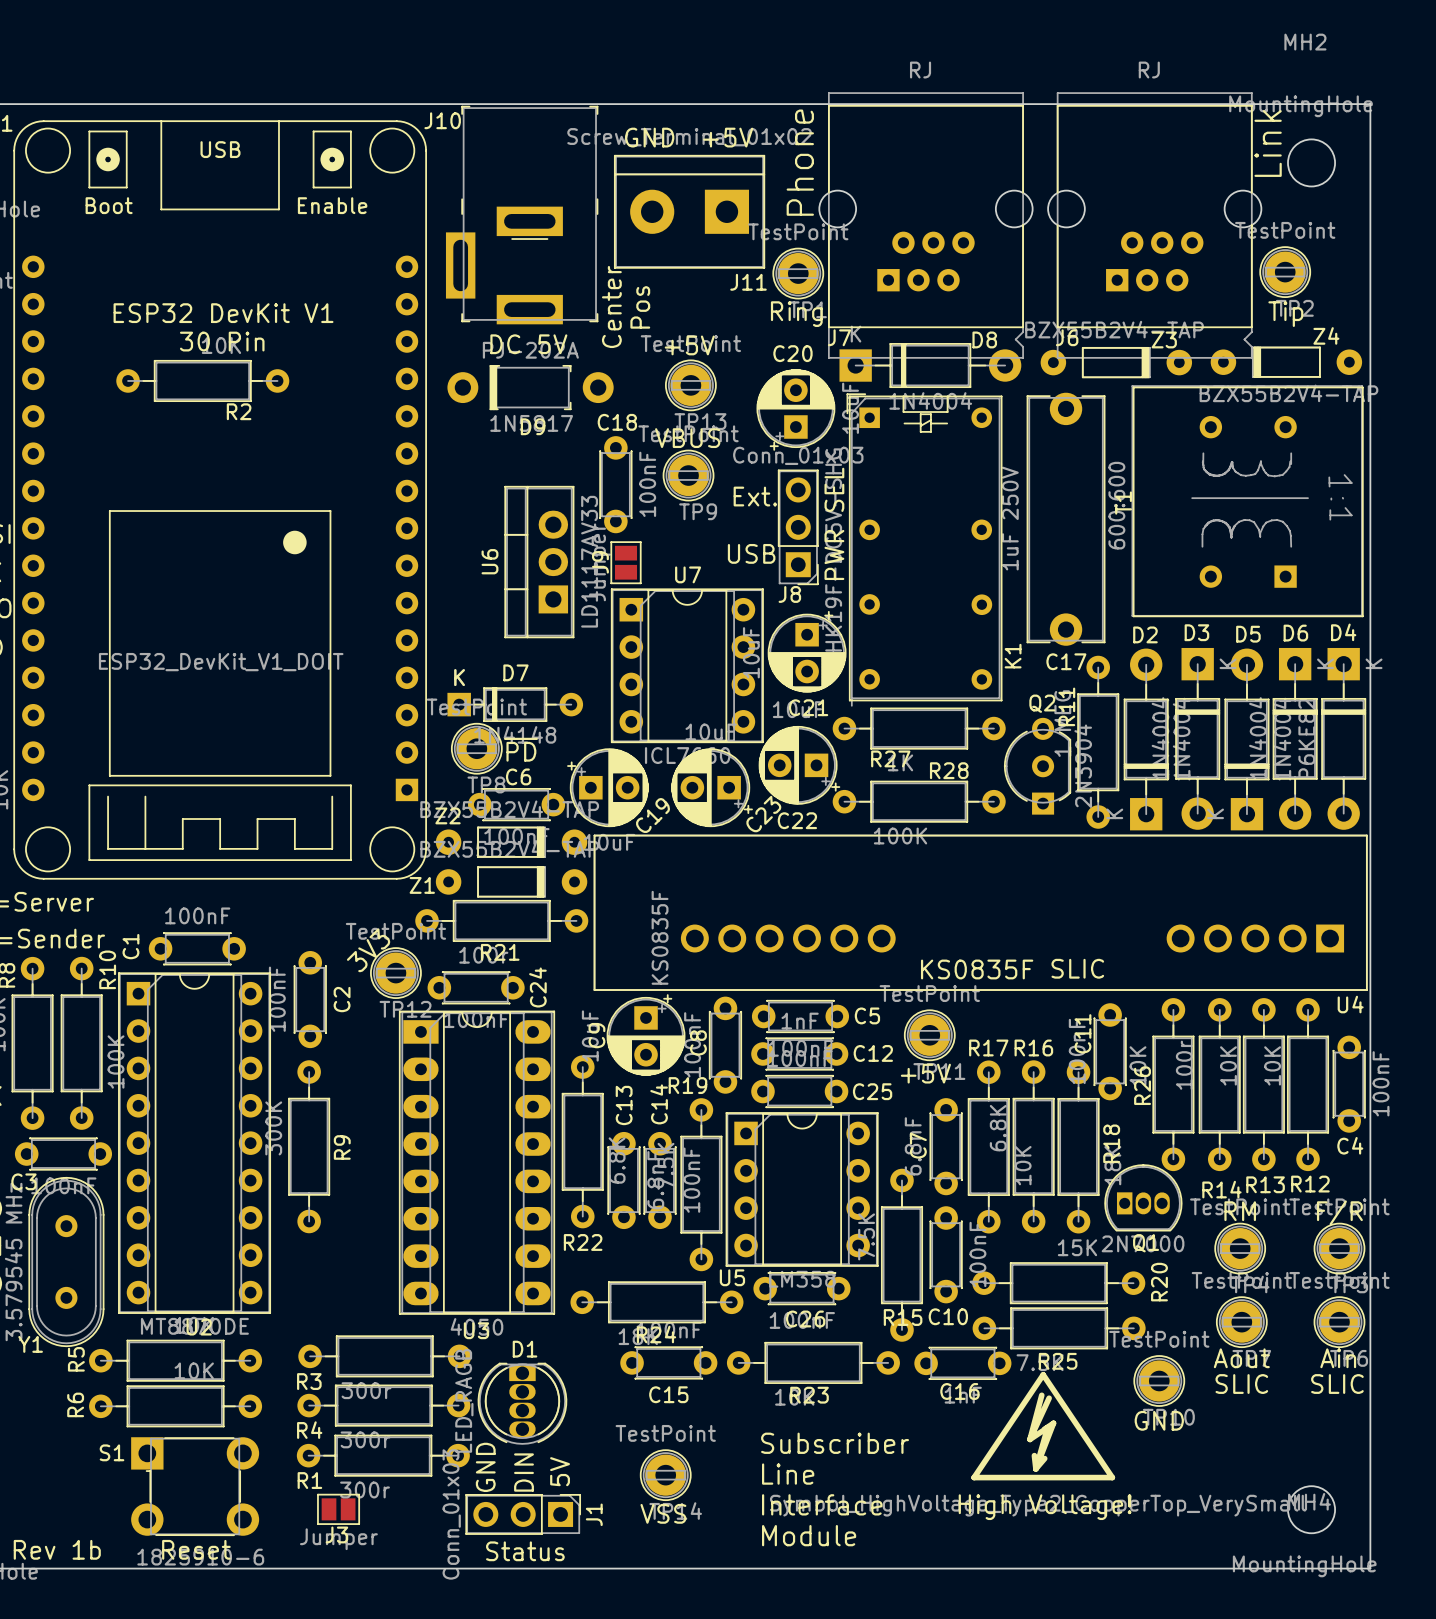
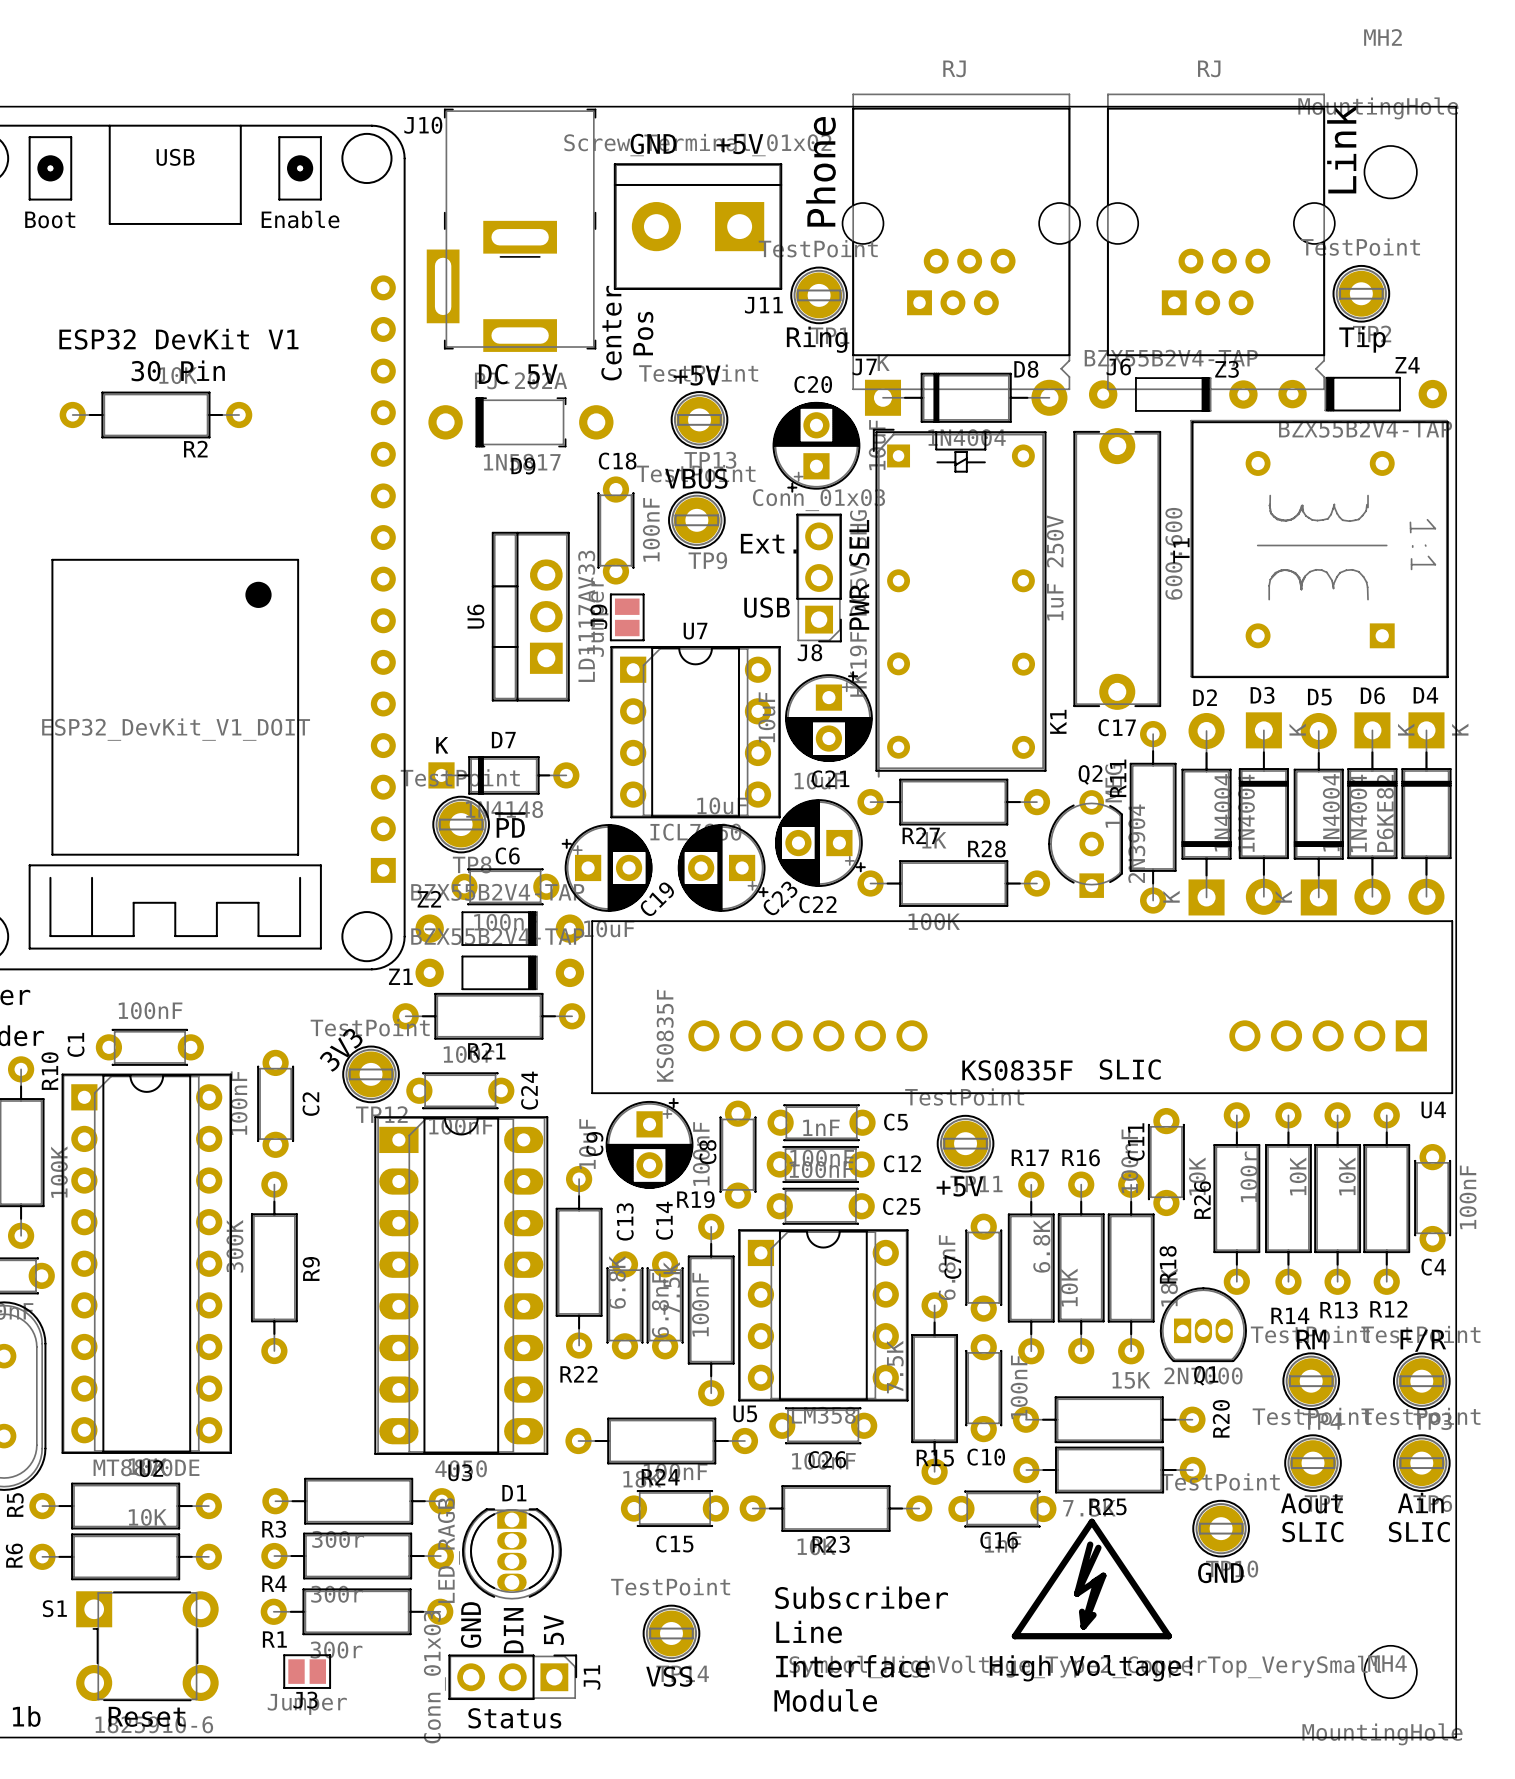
T1 footprint: [1131, 385, 1364, 618] -> [1190, 419, 1449, 679]

